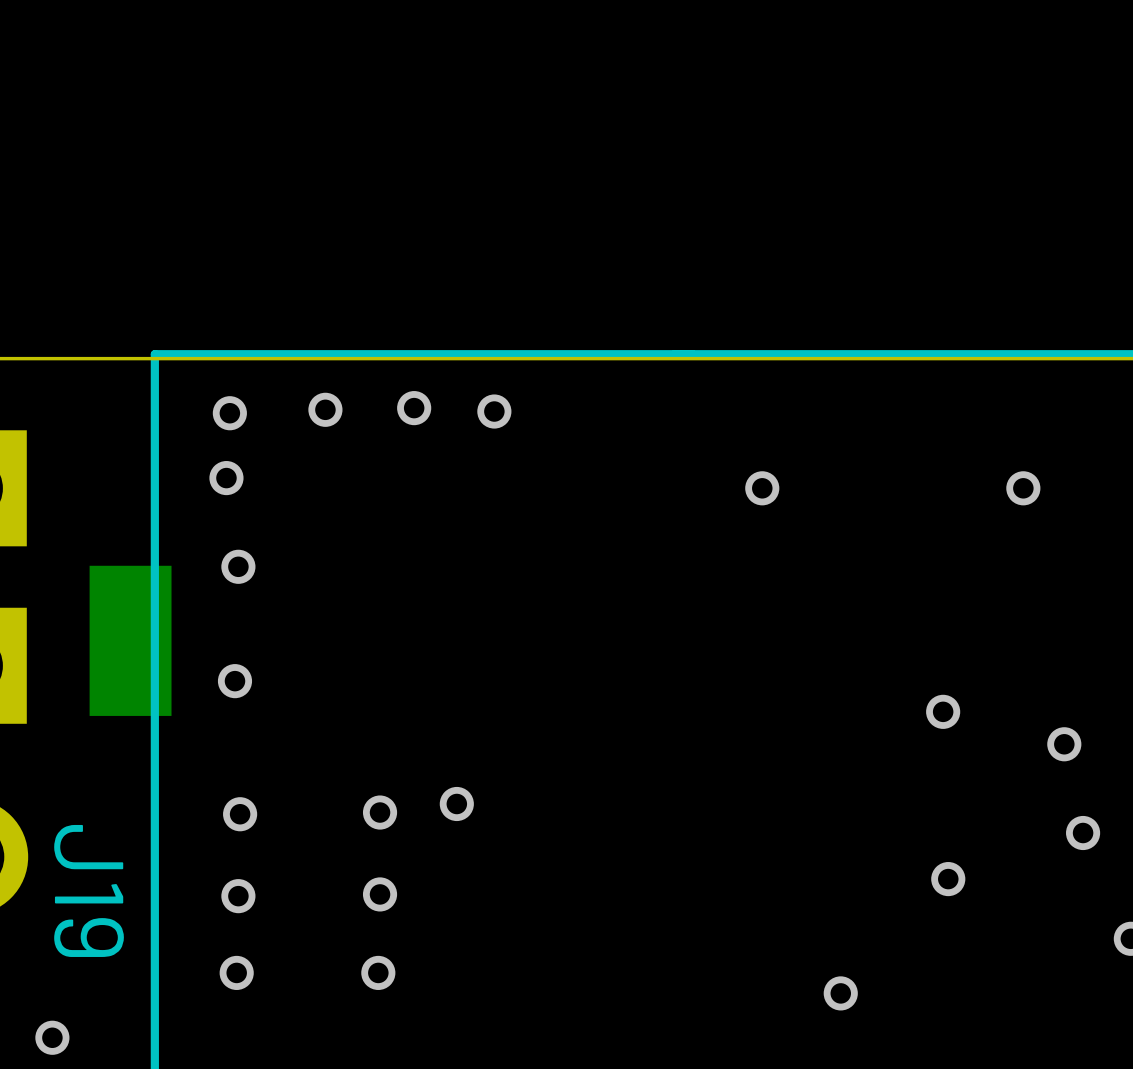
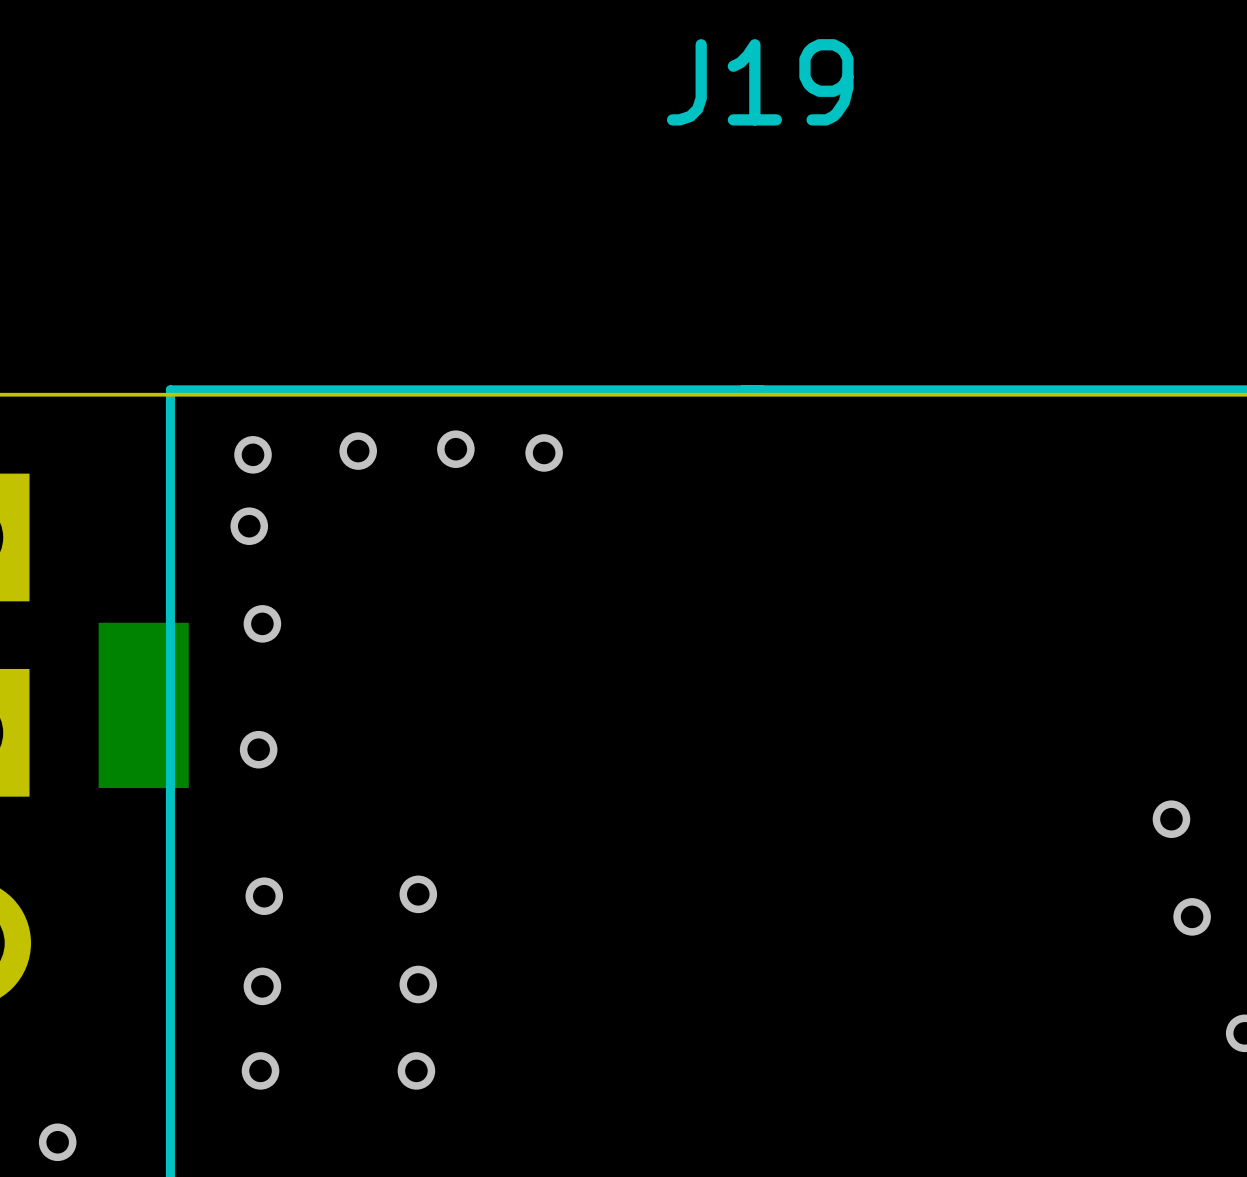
via: (762, 488) -> none
via: (1023, 488) -> none
via: (943, 711) -> none
via: (456, 803) -> none
via: (948, 879) -> none
J19 name rotation: 0° (89, 890) -> 90° counterclockwise (760, 82)
J19 name position: J19 (89, 890) -> J19 (760, 82)
via: (840, 993) -> none

